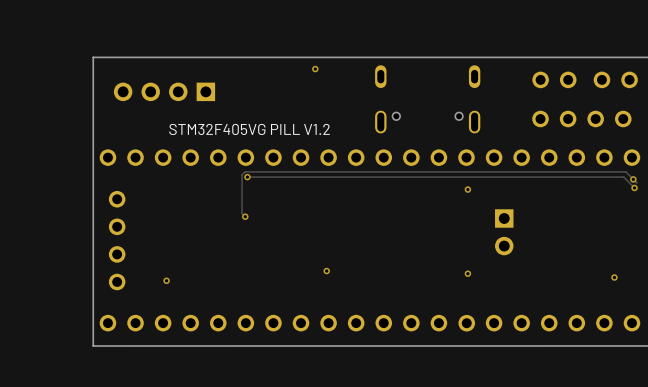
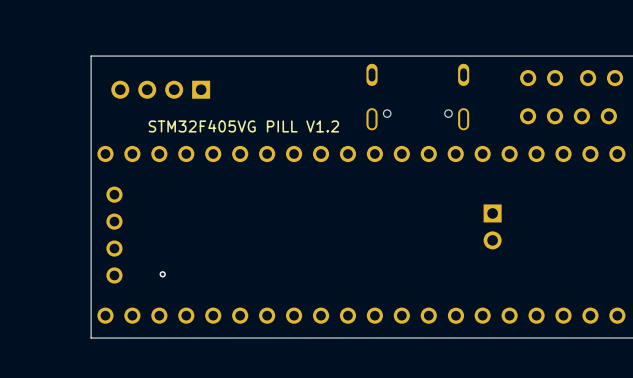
via: (315, 69) -> none
track: (247, 177) (623, 177) (634, 187) -> none
via: (247, 177) -> none
via: (633, 179) -> none
track: (636, 182) (625, 171) (245, 171) (242, 174) (242, 213) (245, 216) -> none
via: (634, 187) -> none
via: (467, 189) -> none
via: (245, 216) -> none
via: (326, 271) -> none
via: (467, 273) -> none
via: (614, 277) -> none

